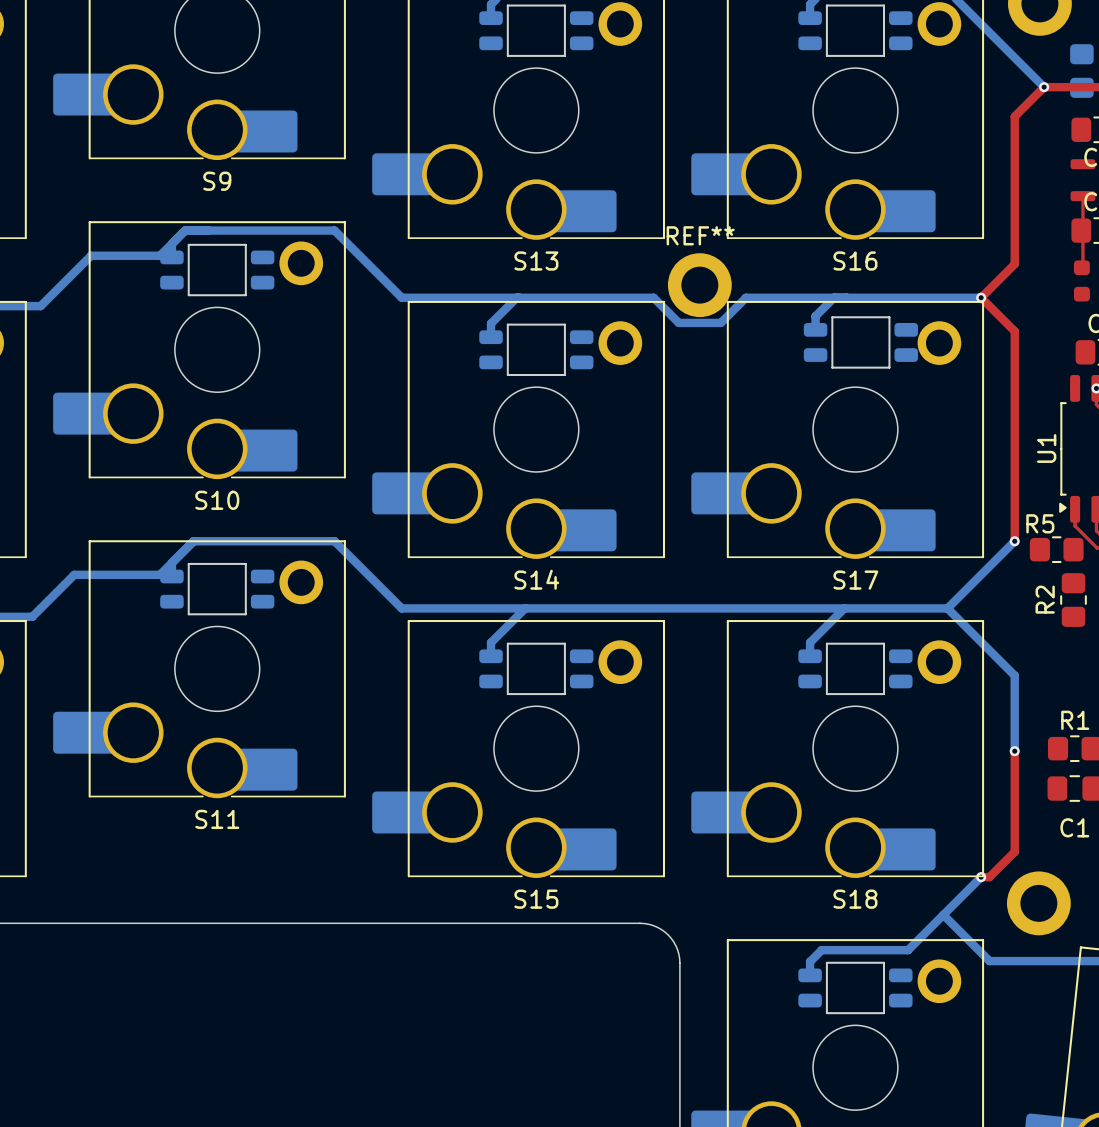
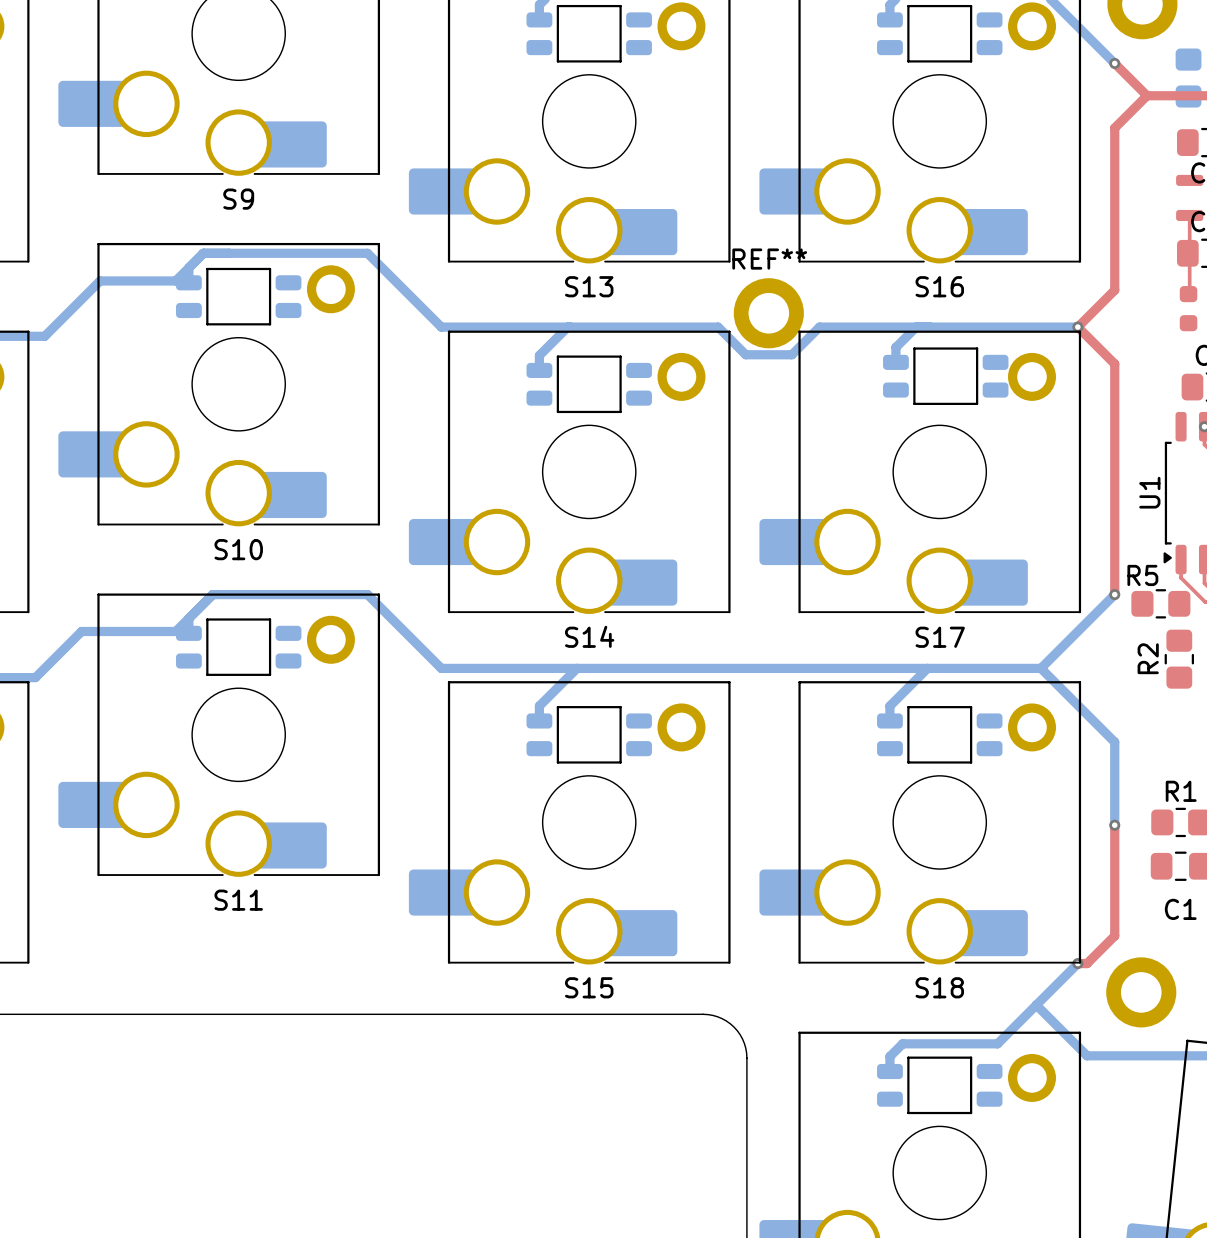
top track: none -> (1114, 63) (1147, 95)
bottom track: (1014, 57) (1044, 87) -> none
via position: (1044, 87) -> (1114, 63)

